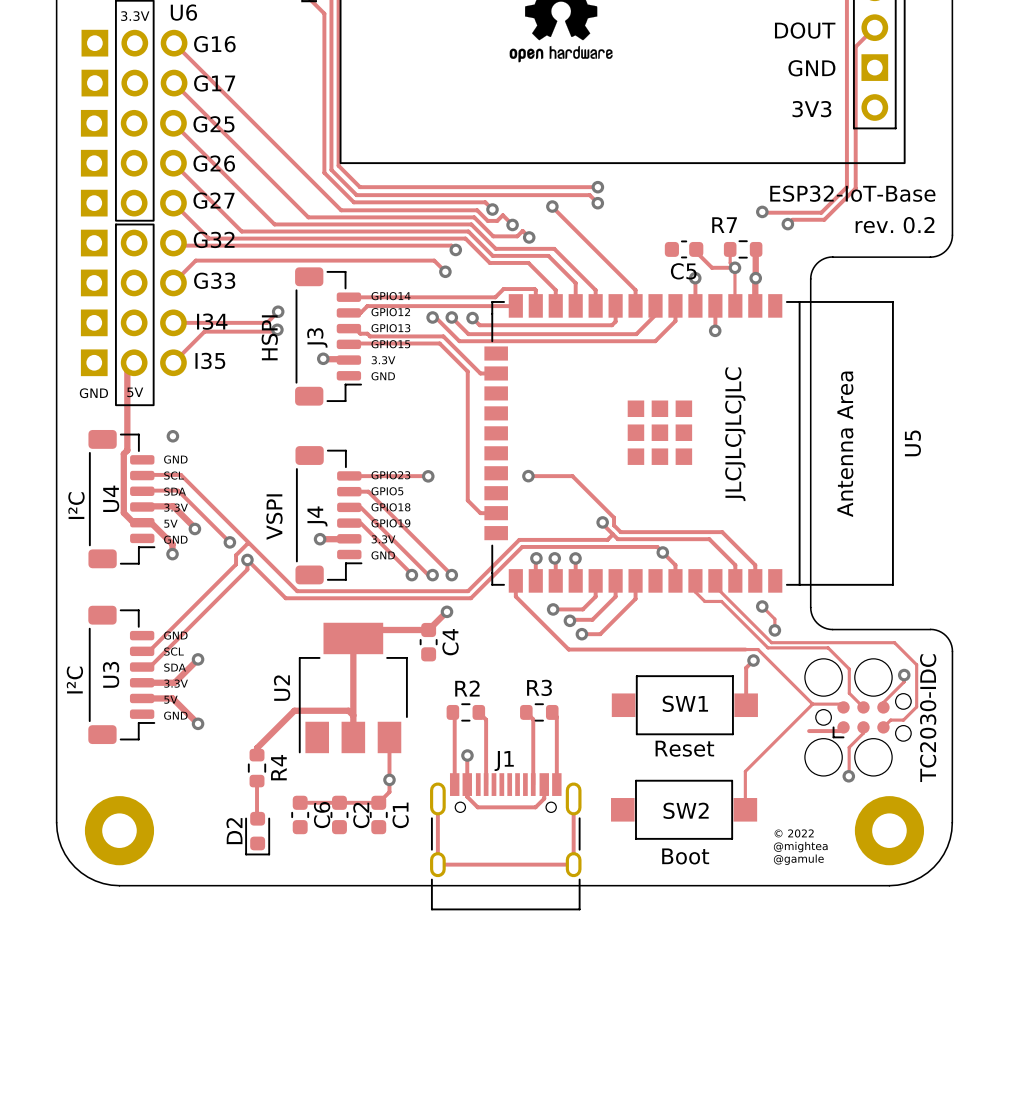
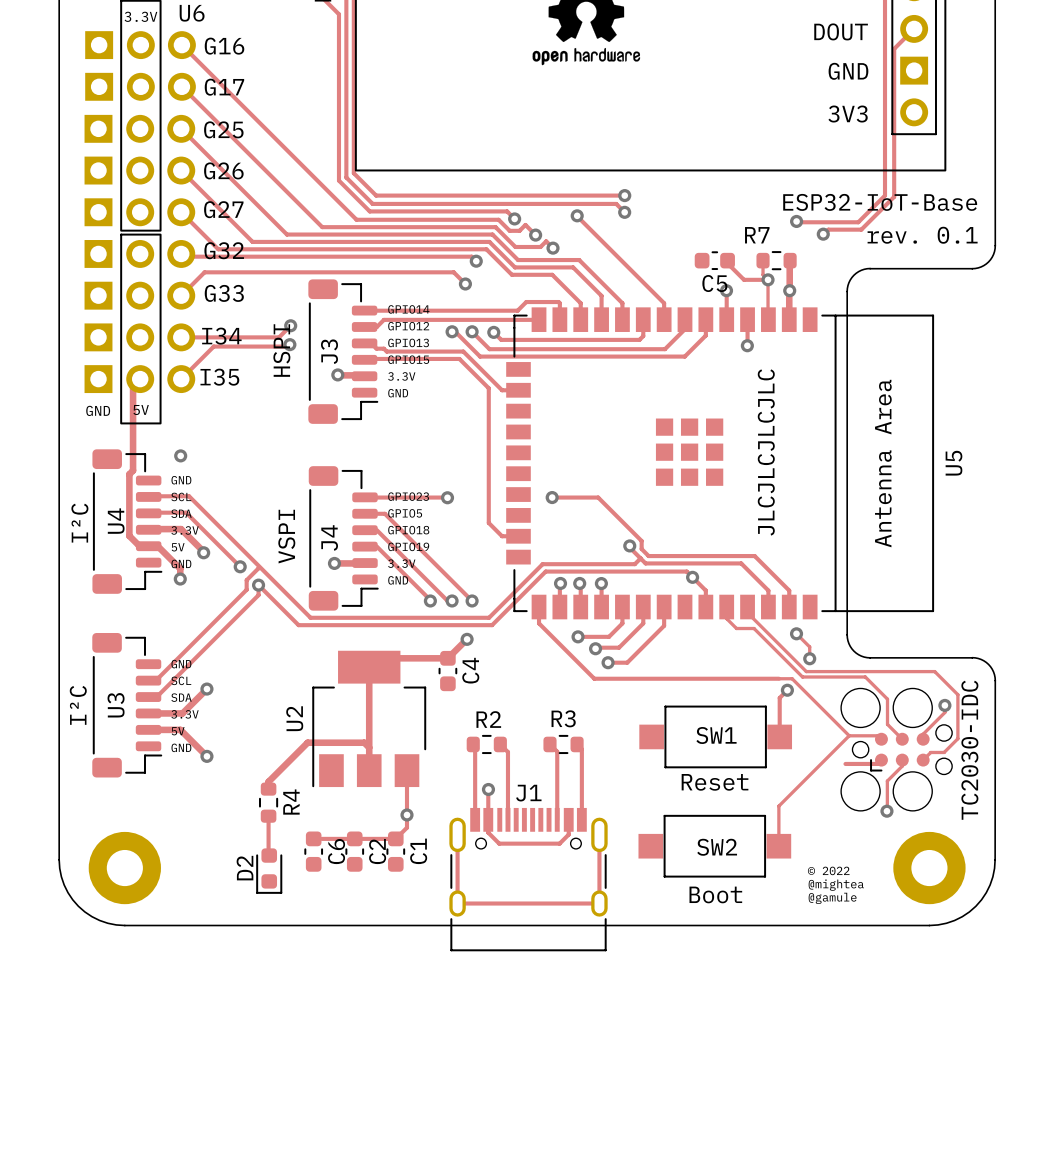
text: rev. 0.2 (895, 225) -> rev. 0.1 (922, 235)

